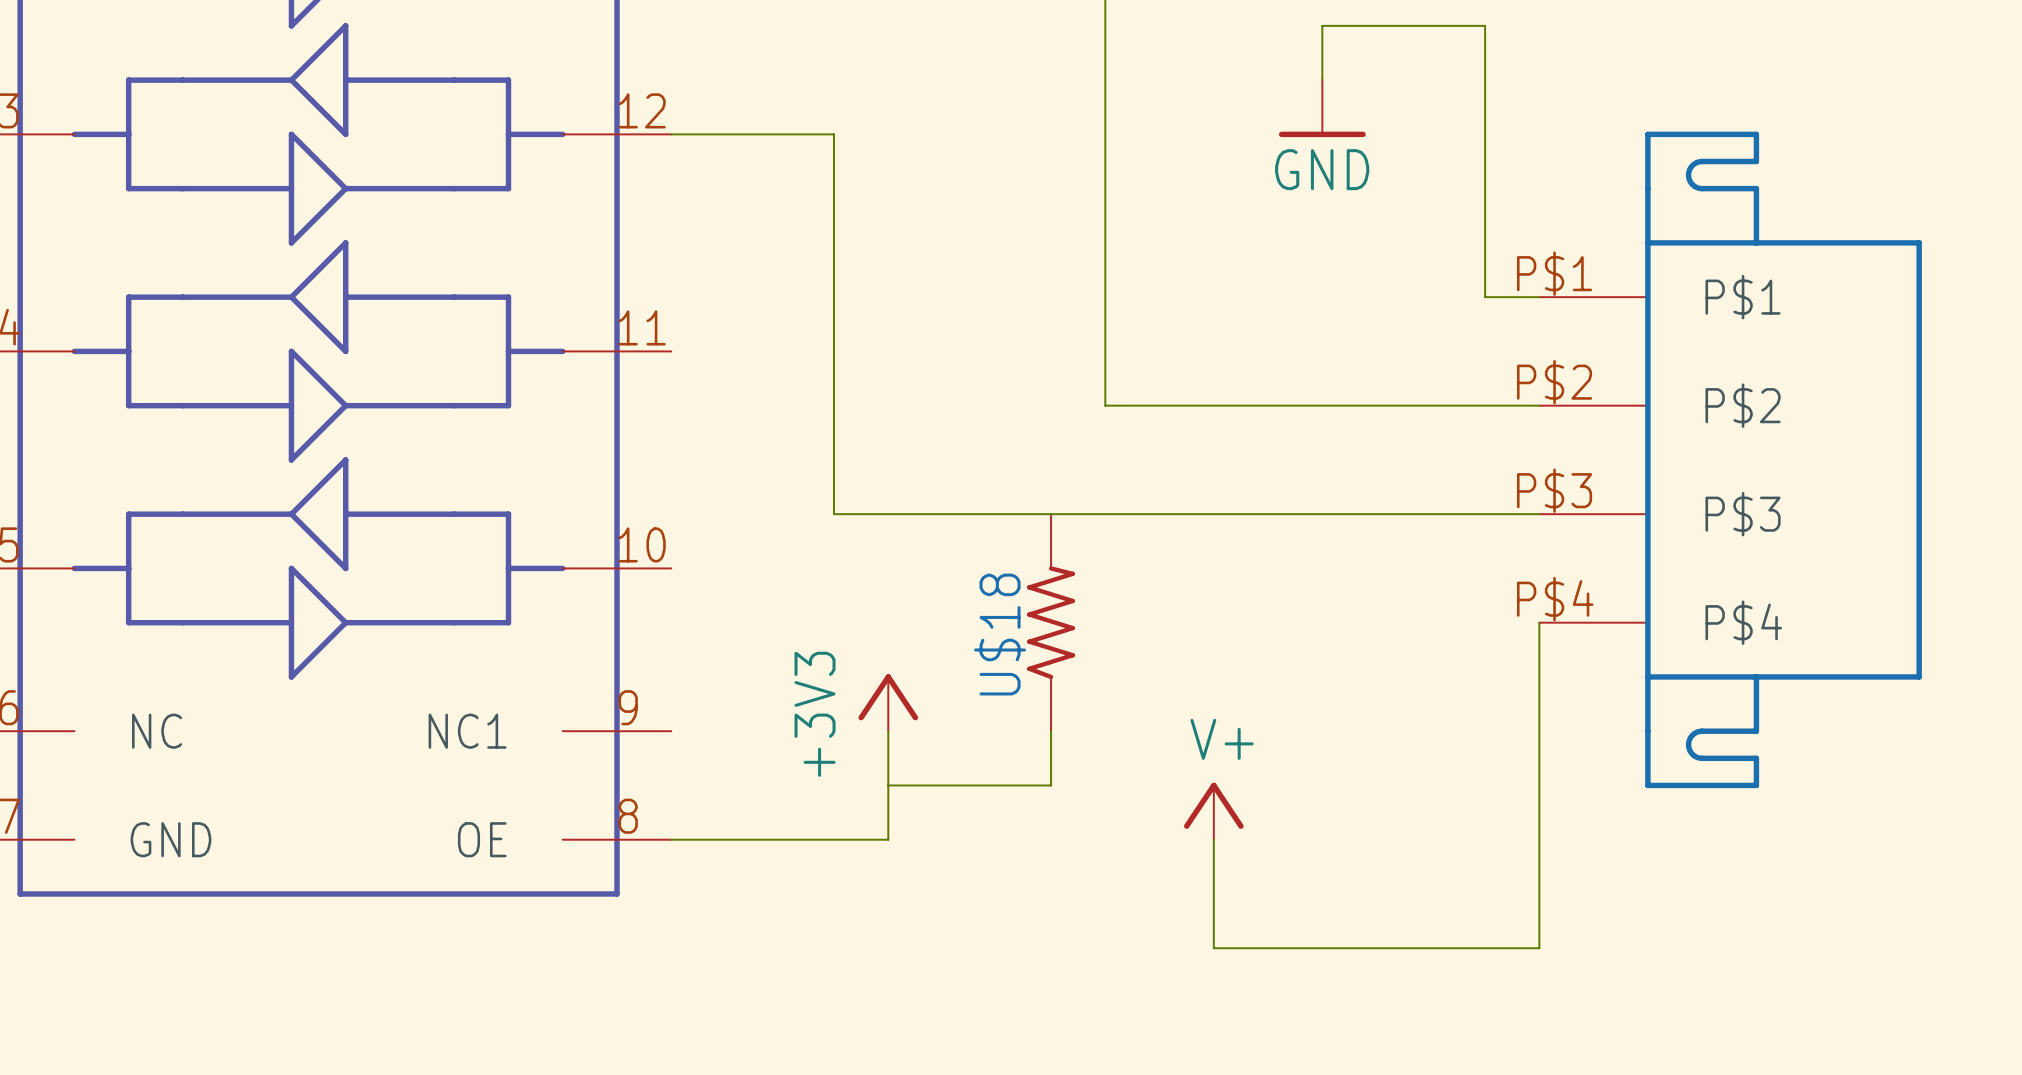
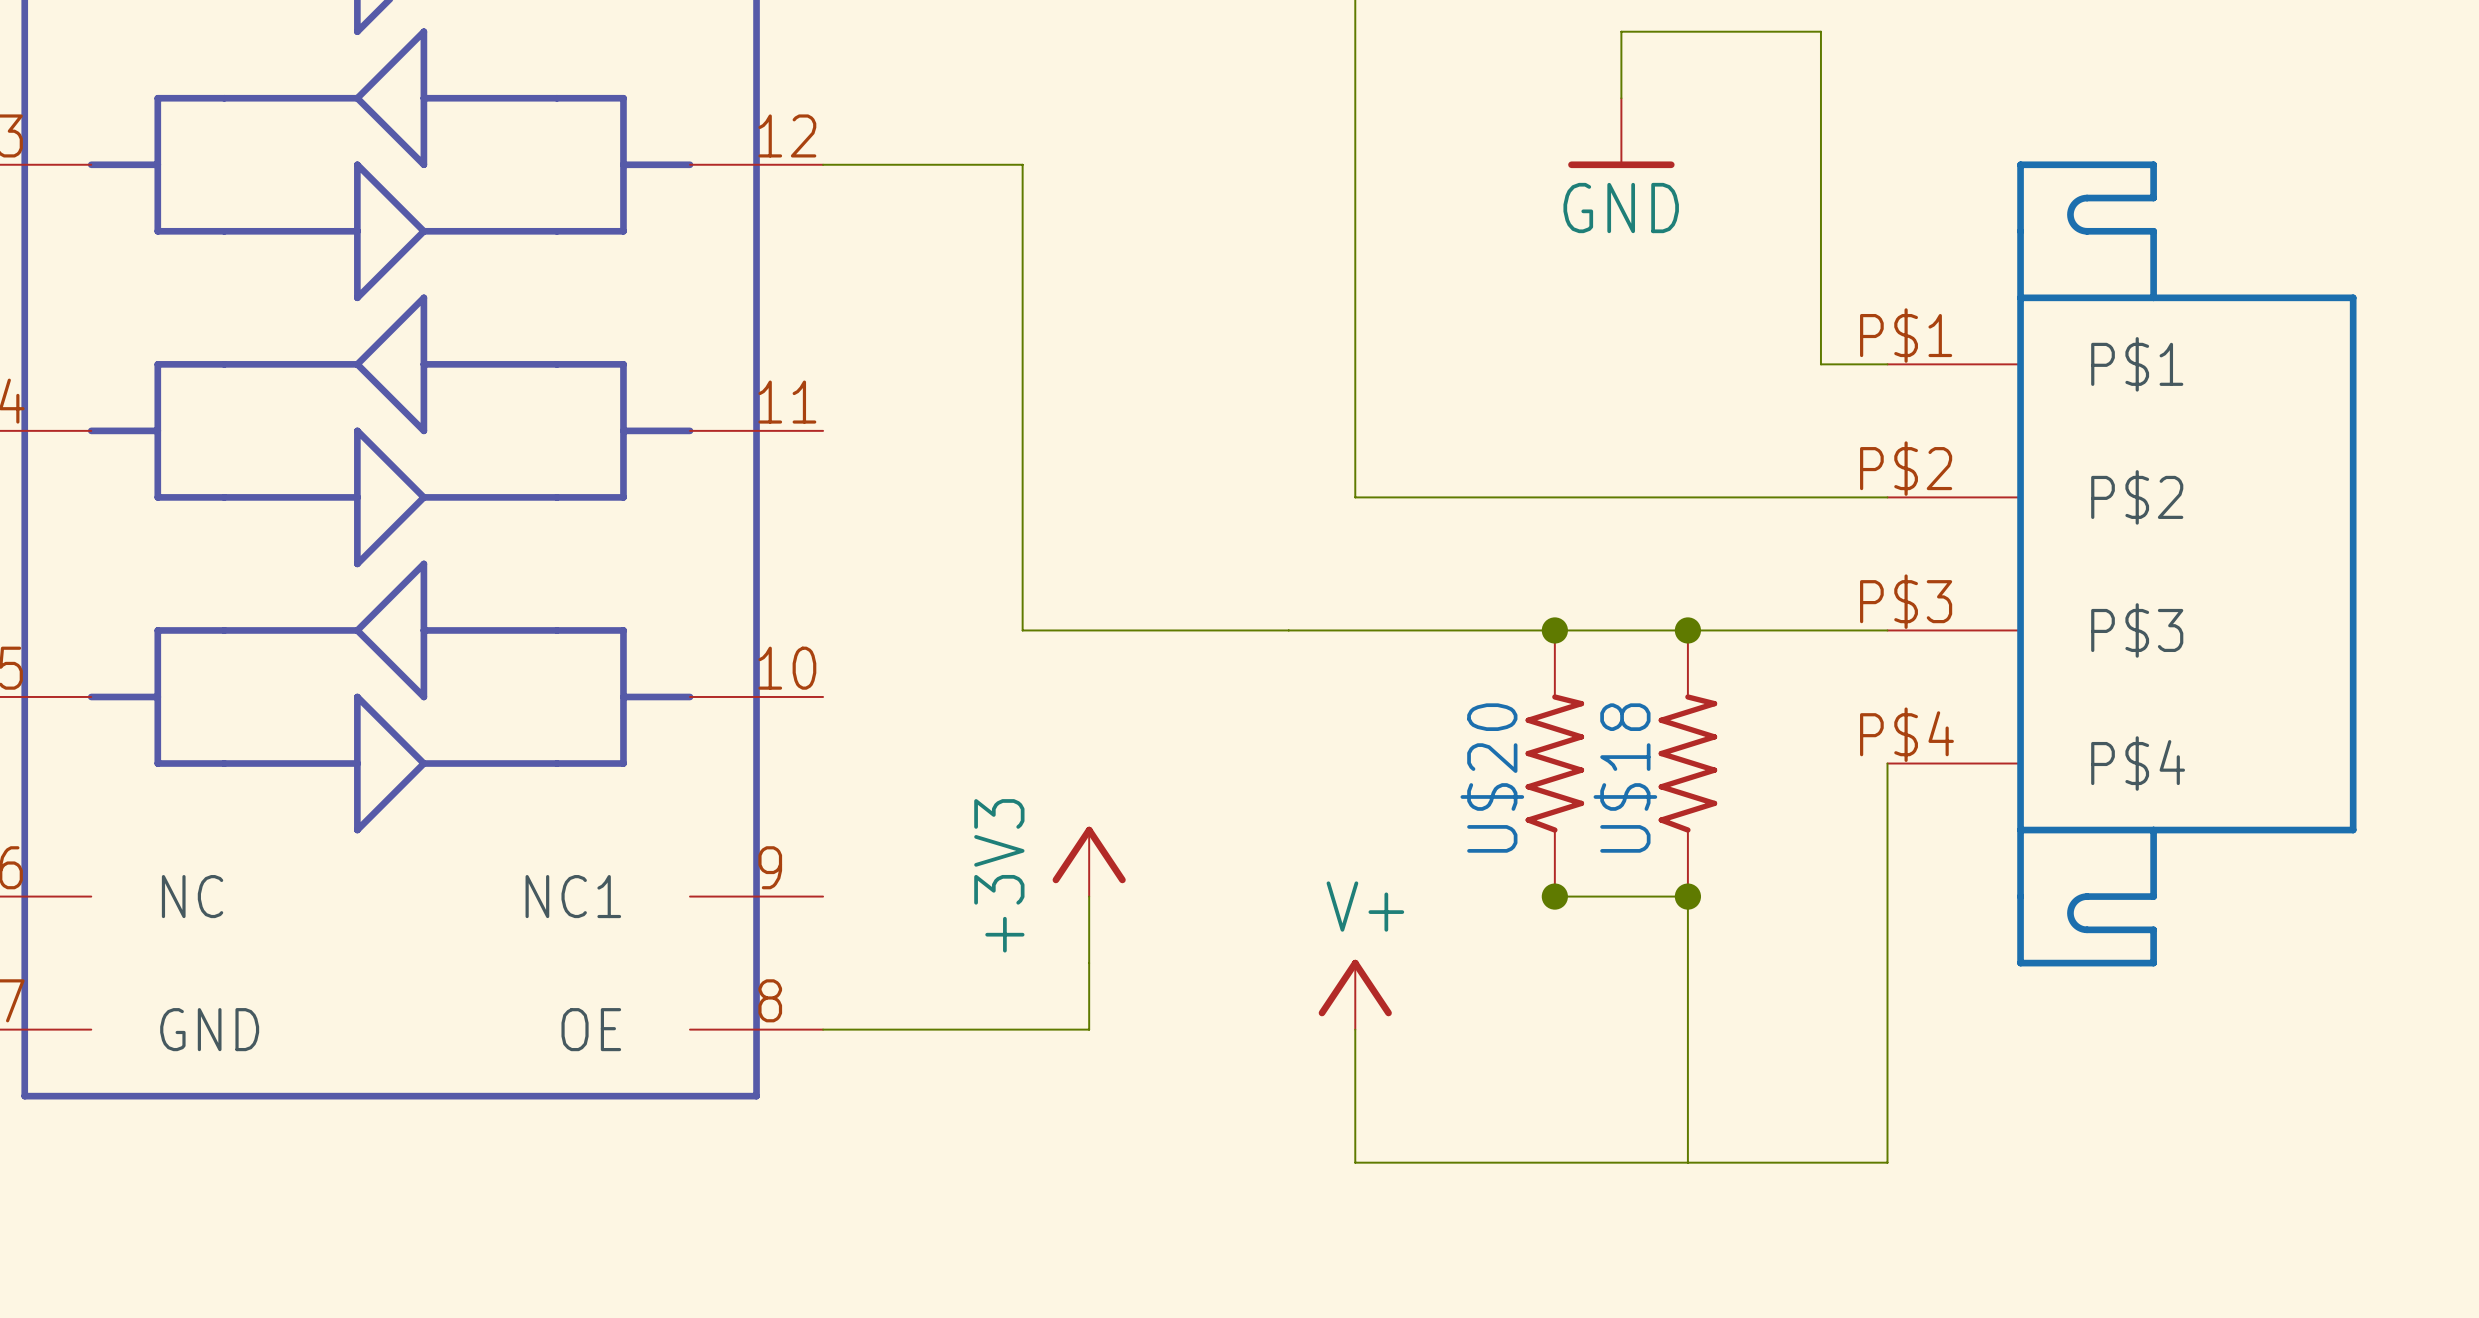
junction: none -> (1554, 630)
junction: none -> (1687, 630)
U$18 position: (1051, 622) -> (1687, 763)
U$20: none -> (1554, 763)
wire: (1051, 731) (1051, 785) (888, 785) -> none
wire: none -> (1554, 896) (1687, 896) (1687, 1162)
junction: none -> (1554, 896)
junction: none -> (1687, 896)
power symbol position: V+ (1213, 811) -> V+ (1355, 994)
wire: (1213, 839) (1213, 948) -> (1355, 1029) (1355, 1162) (1488, 1162)

